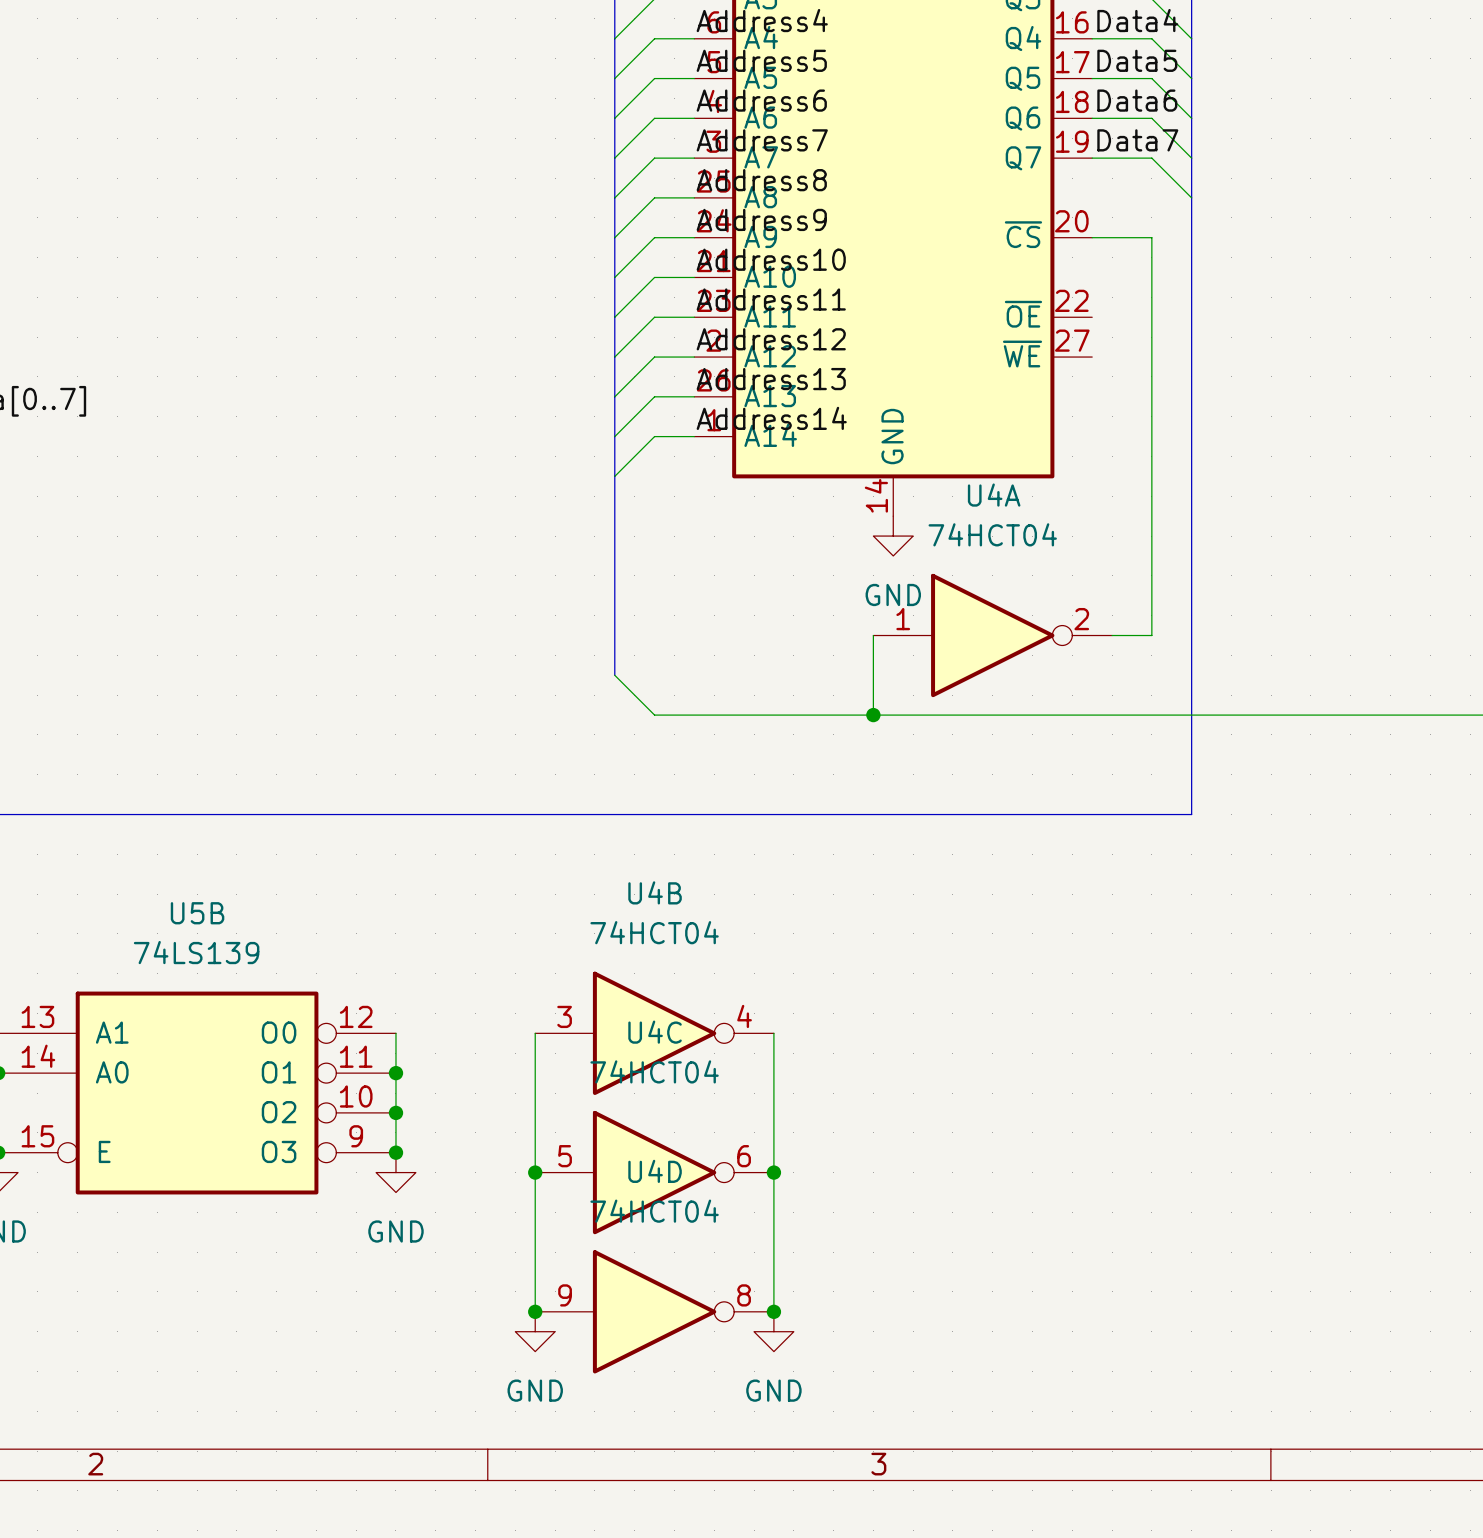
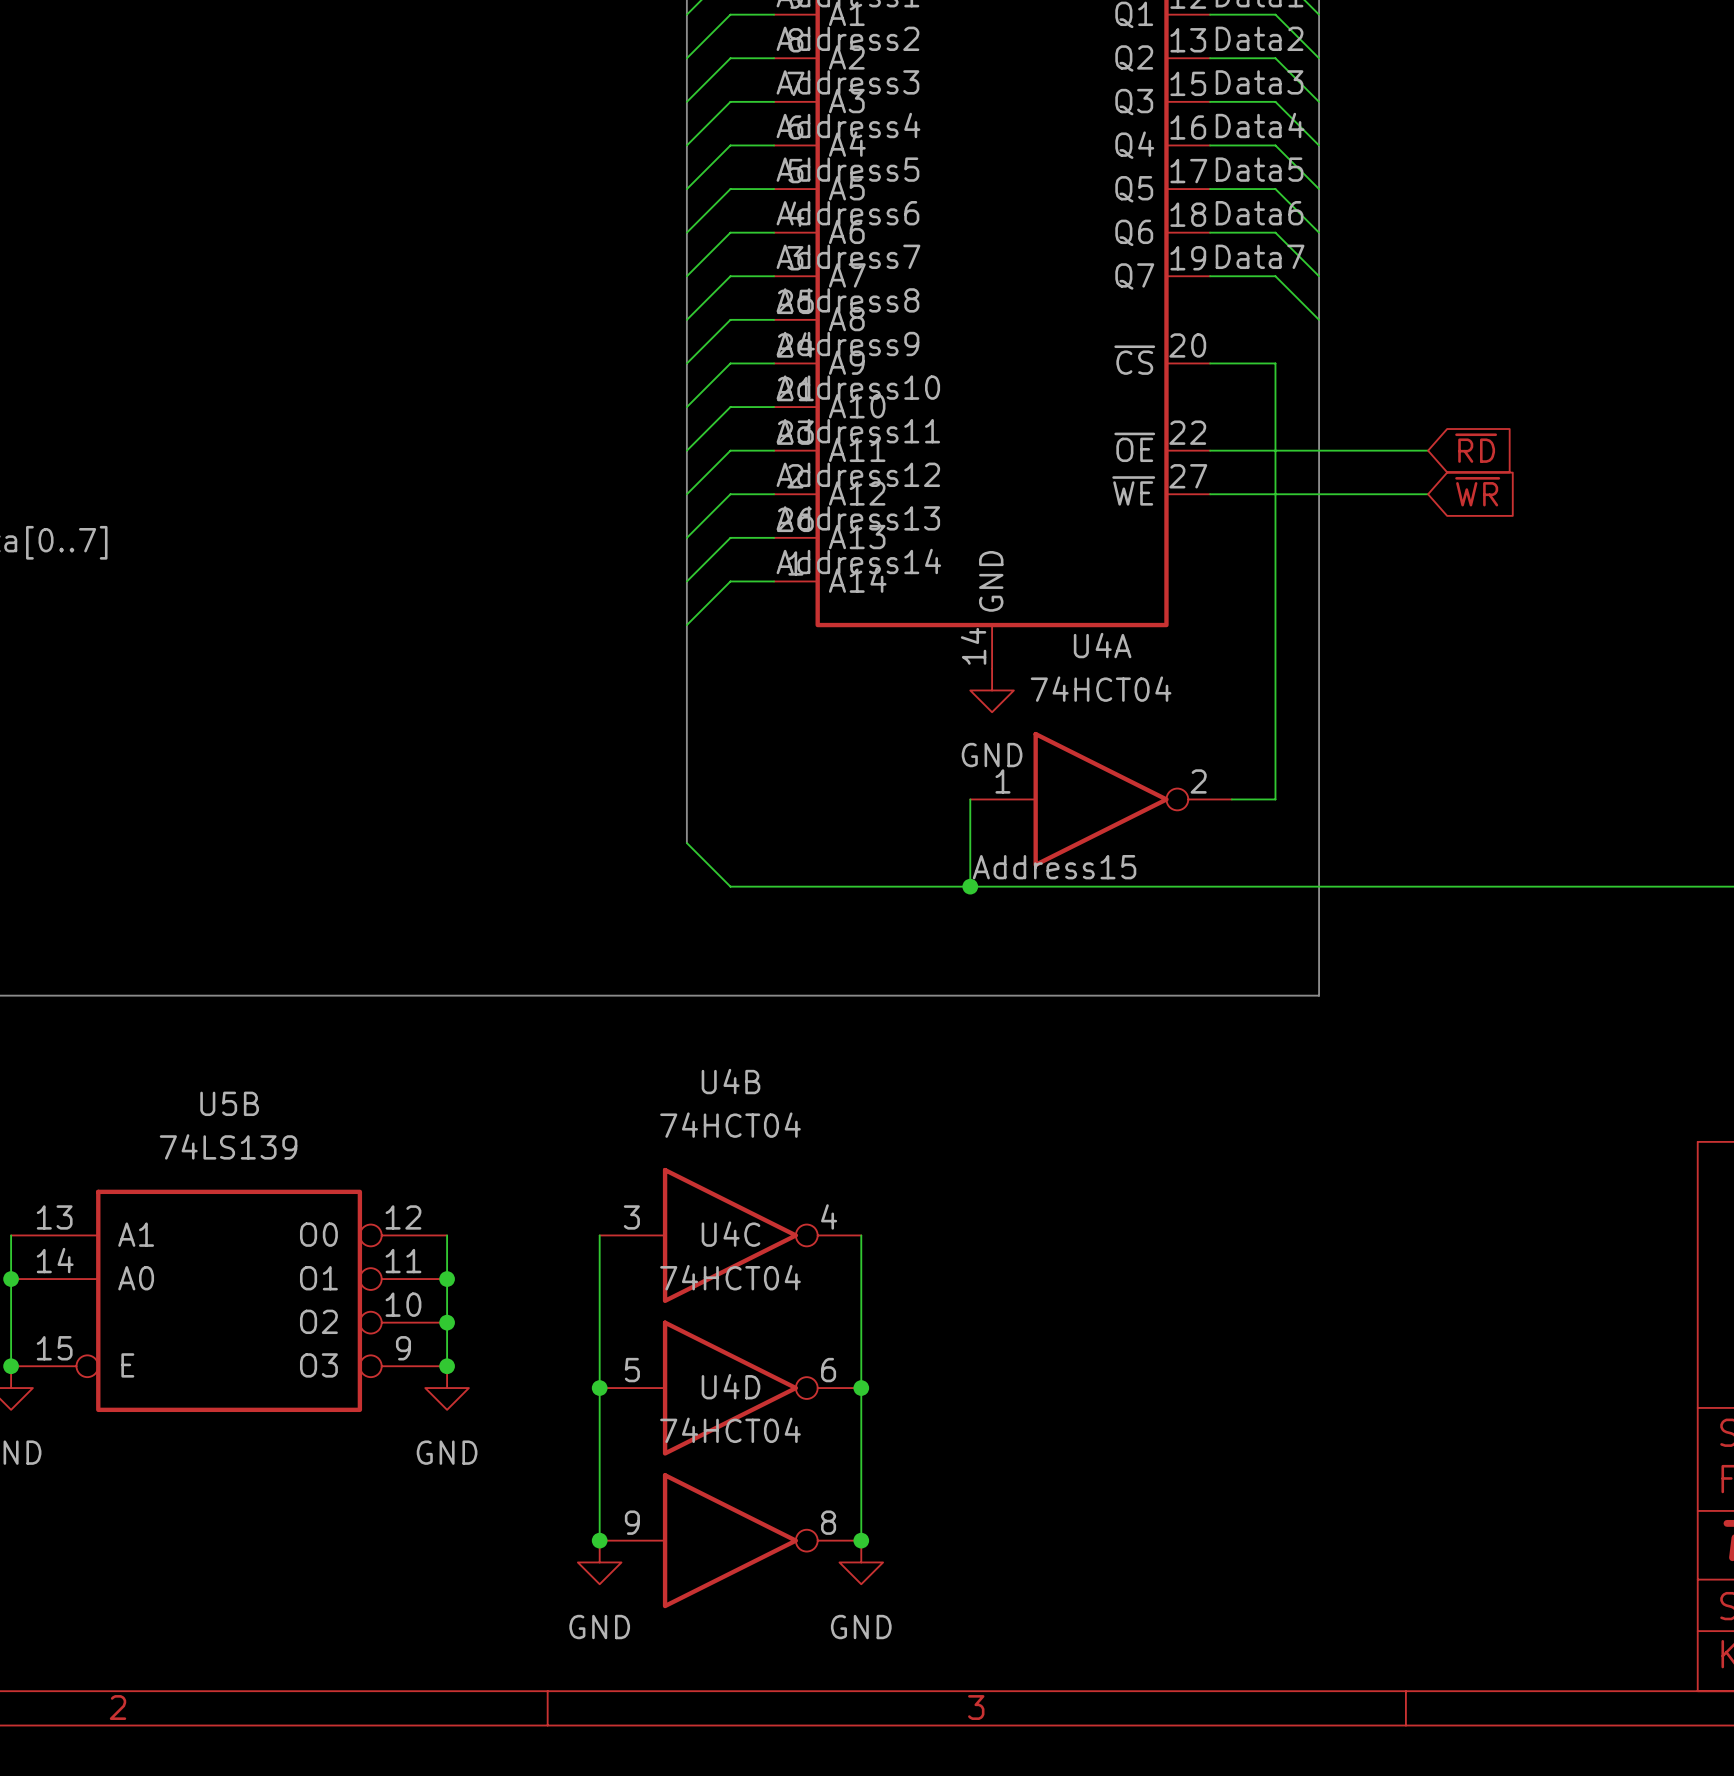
global label: none -> ~{RD} (1476, 448)
wire: none -> (1210, 450) (1428, 450)
global label: none -> ~{WR} (1477, 491)
wire: none -> (1210, 494) (1428, 494)
label: none -> Address15 (1054, 867)

